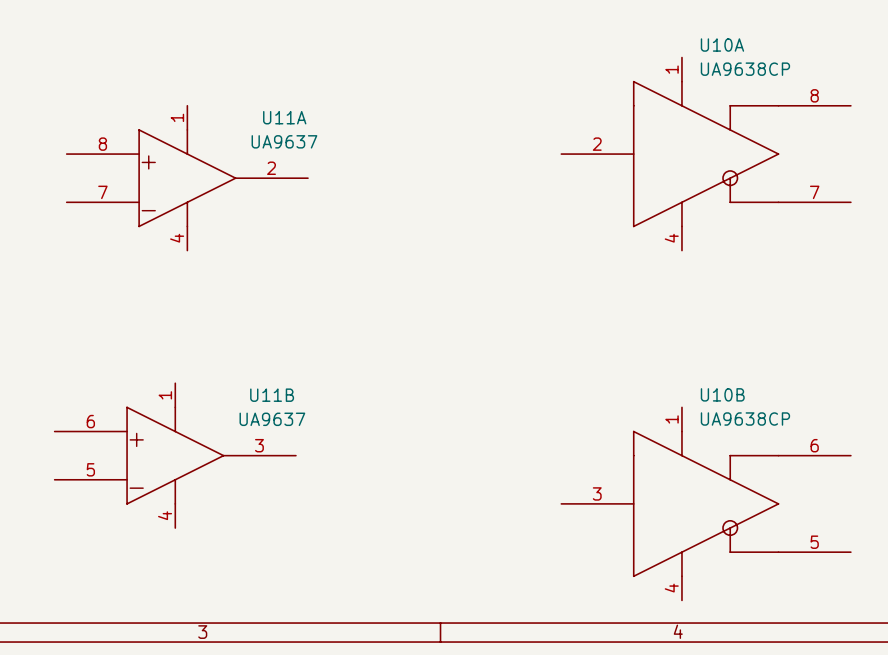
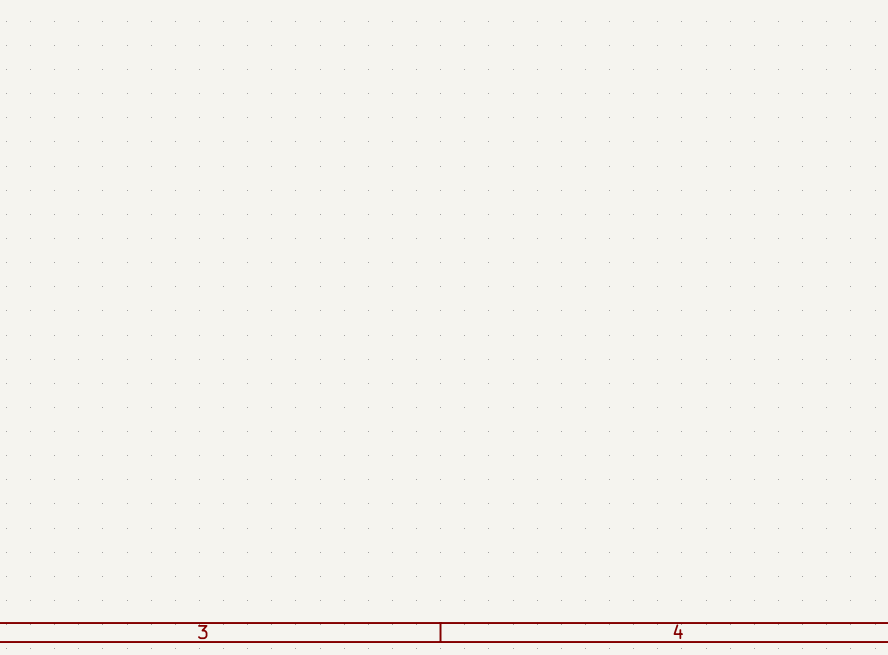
U10A: UA9638CP (706, 154) -> none
U11A: UA9637 (187, 178) -> none
U11B: UA9637 (175, 455) -> none
U10B: UA9638CP (706, 503) -> none

